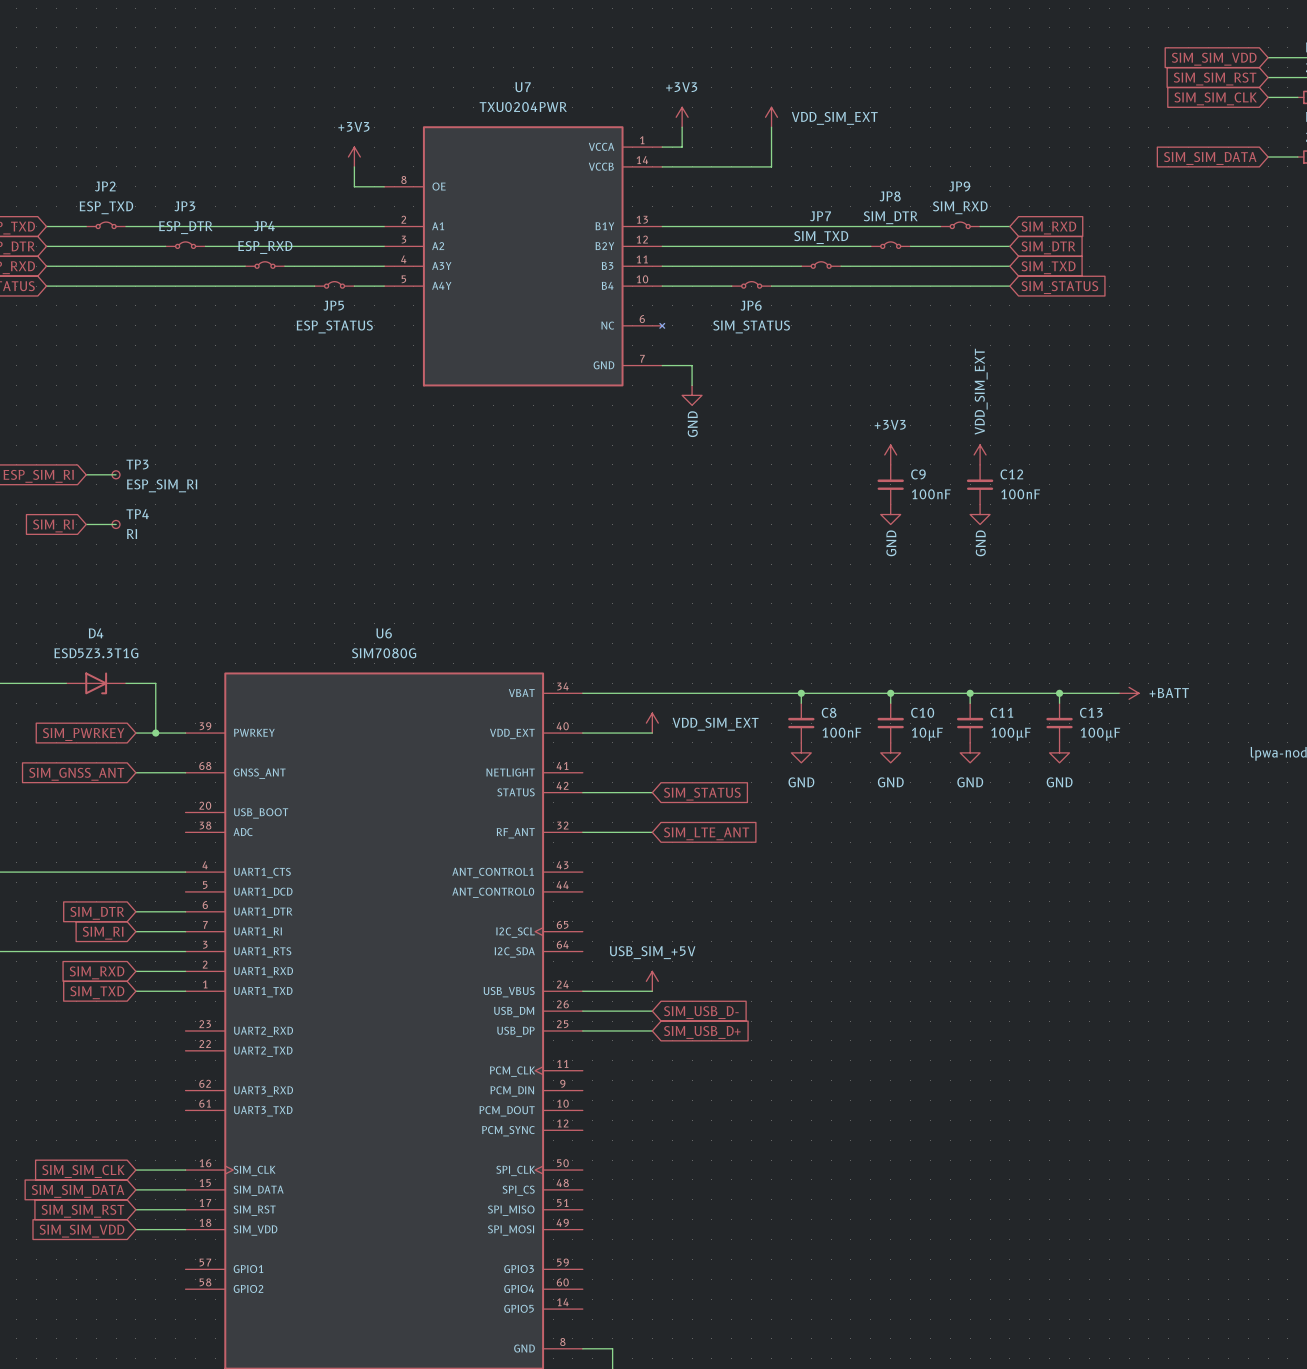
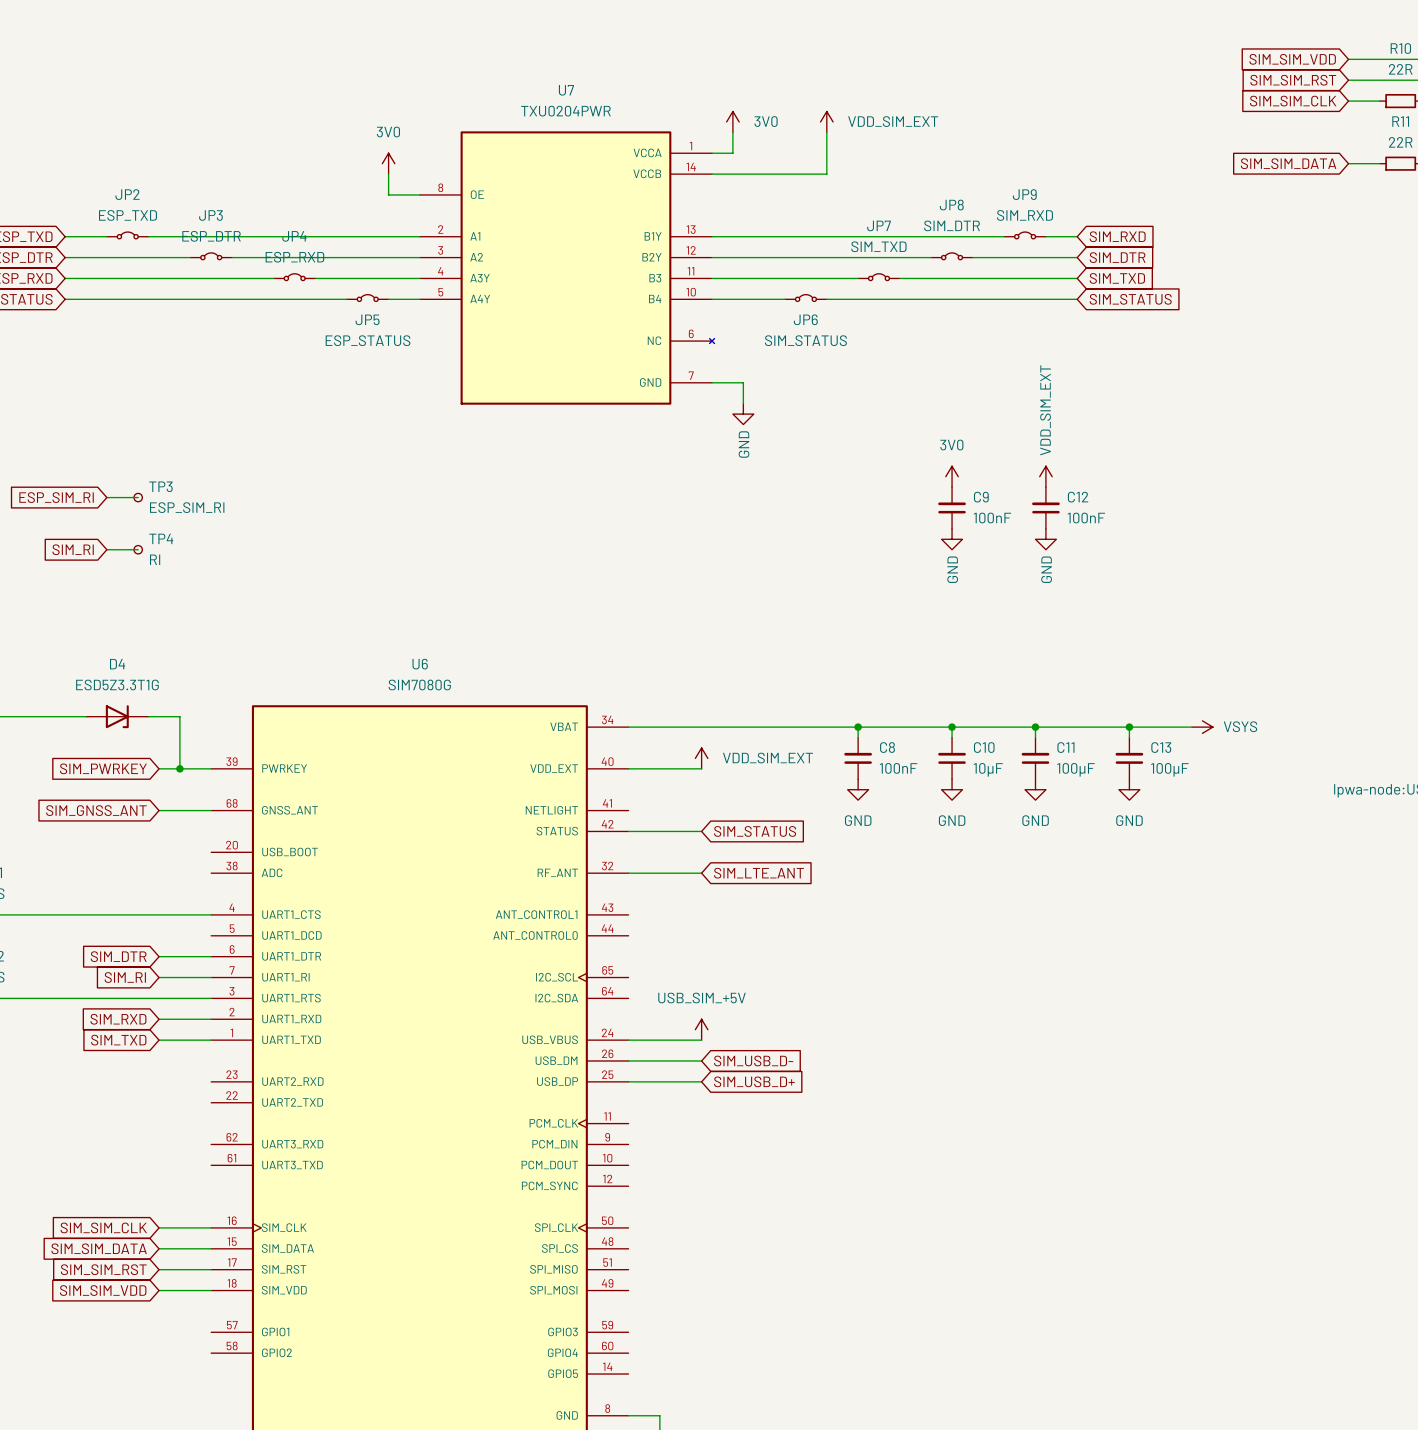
power symbol: +3V3 (682, 117) -> 3V0 (732, 121)
power symbol: +3V3 (354, 157) -> 3V0 (388, 163)
power symbol: +3V3 (890, 454) -> 3V0 (952, 476)
power symbol: +BATT (1129, 693) -> VSYS (1202, 727)

